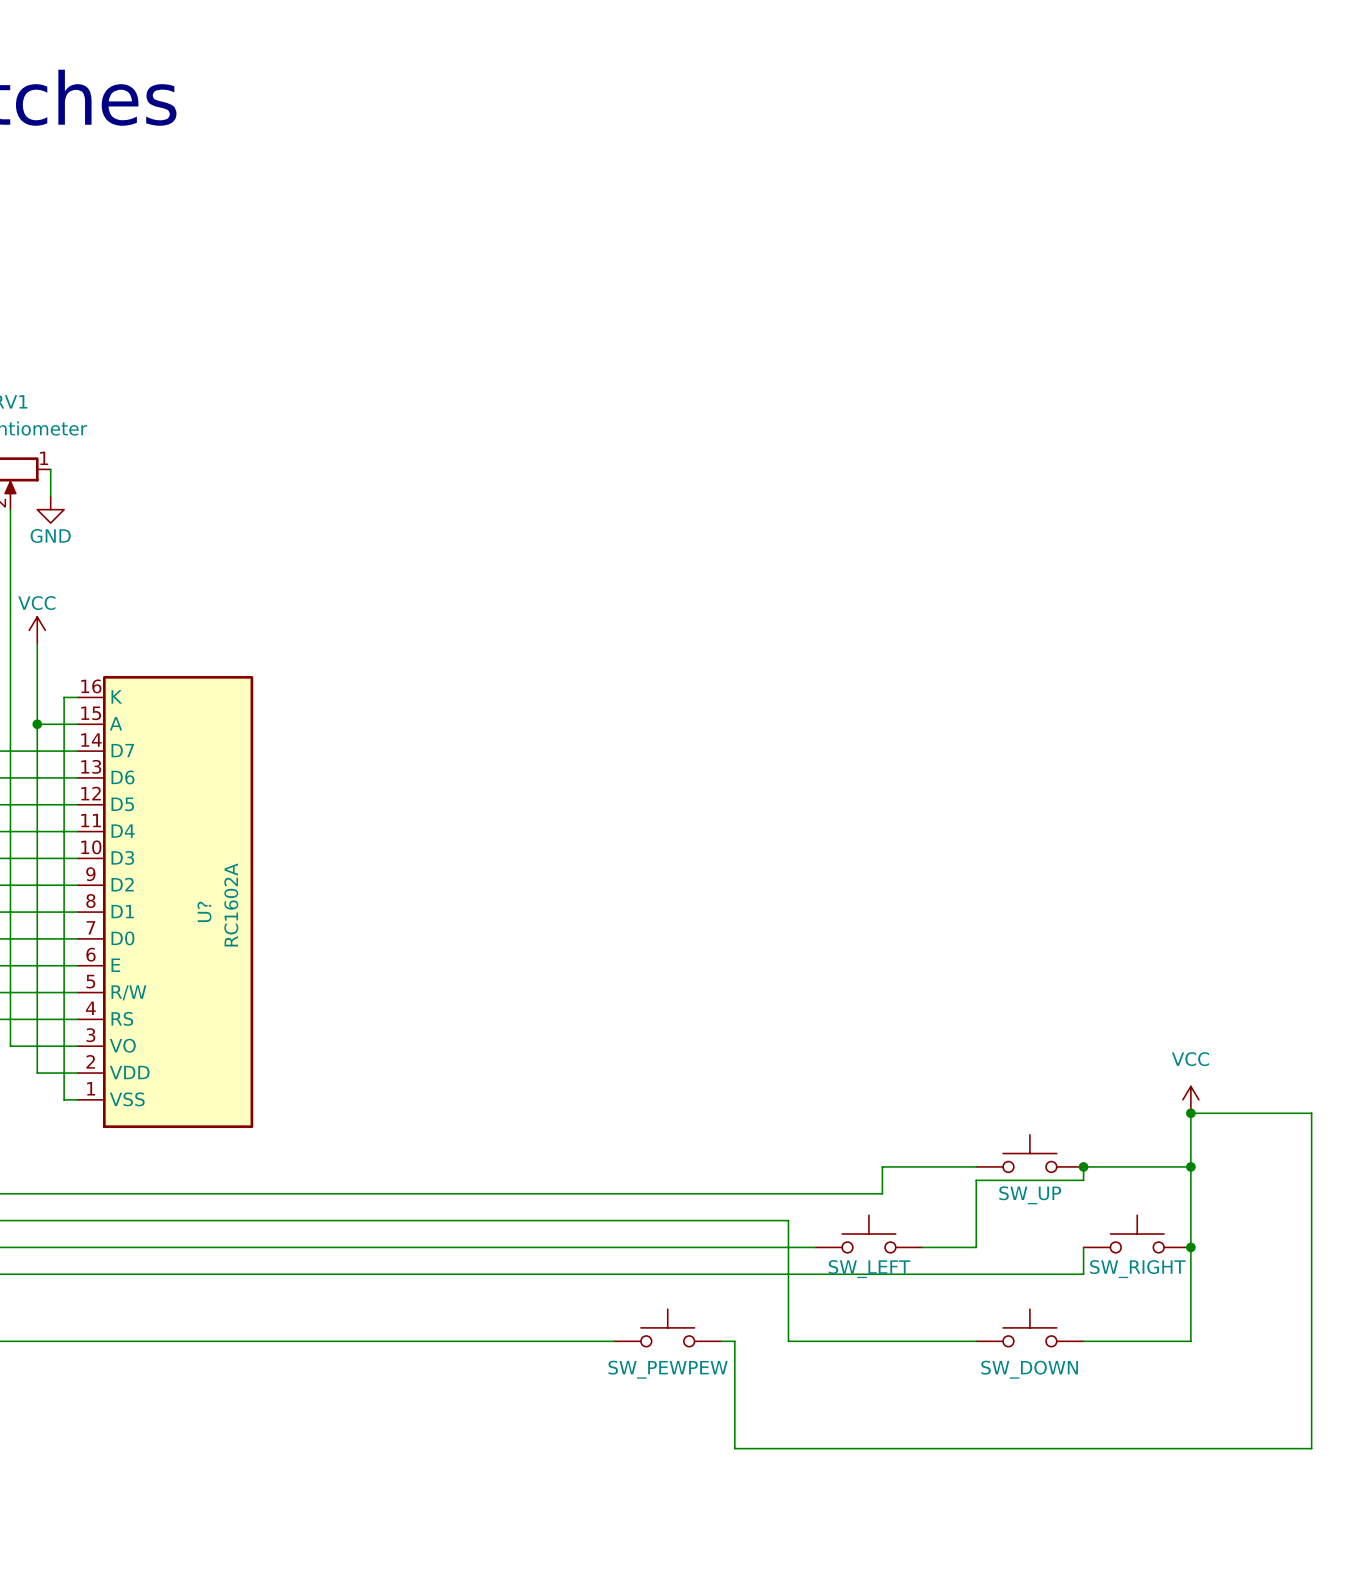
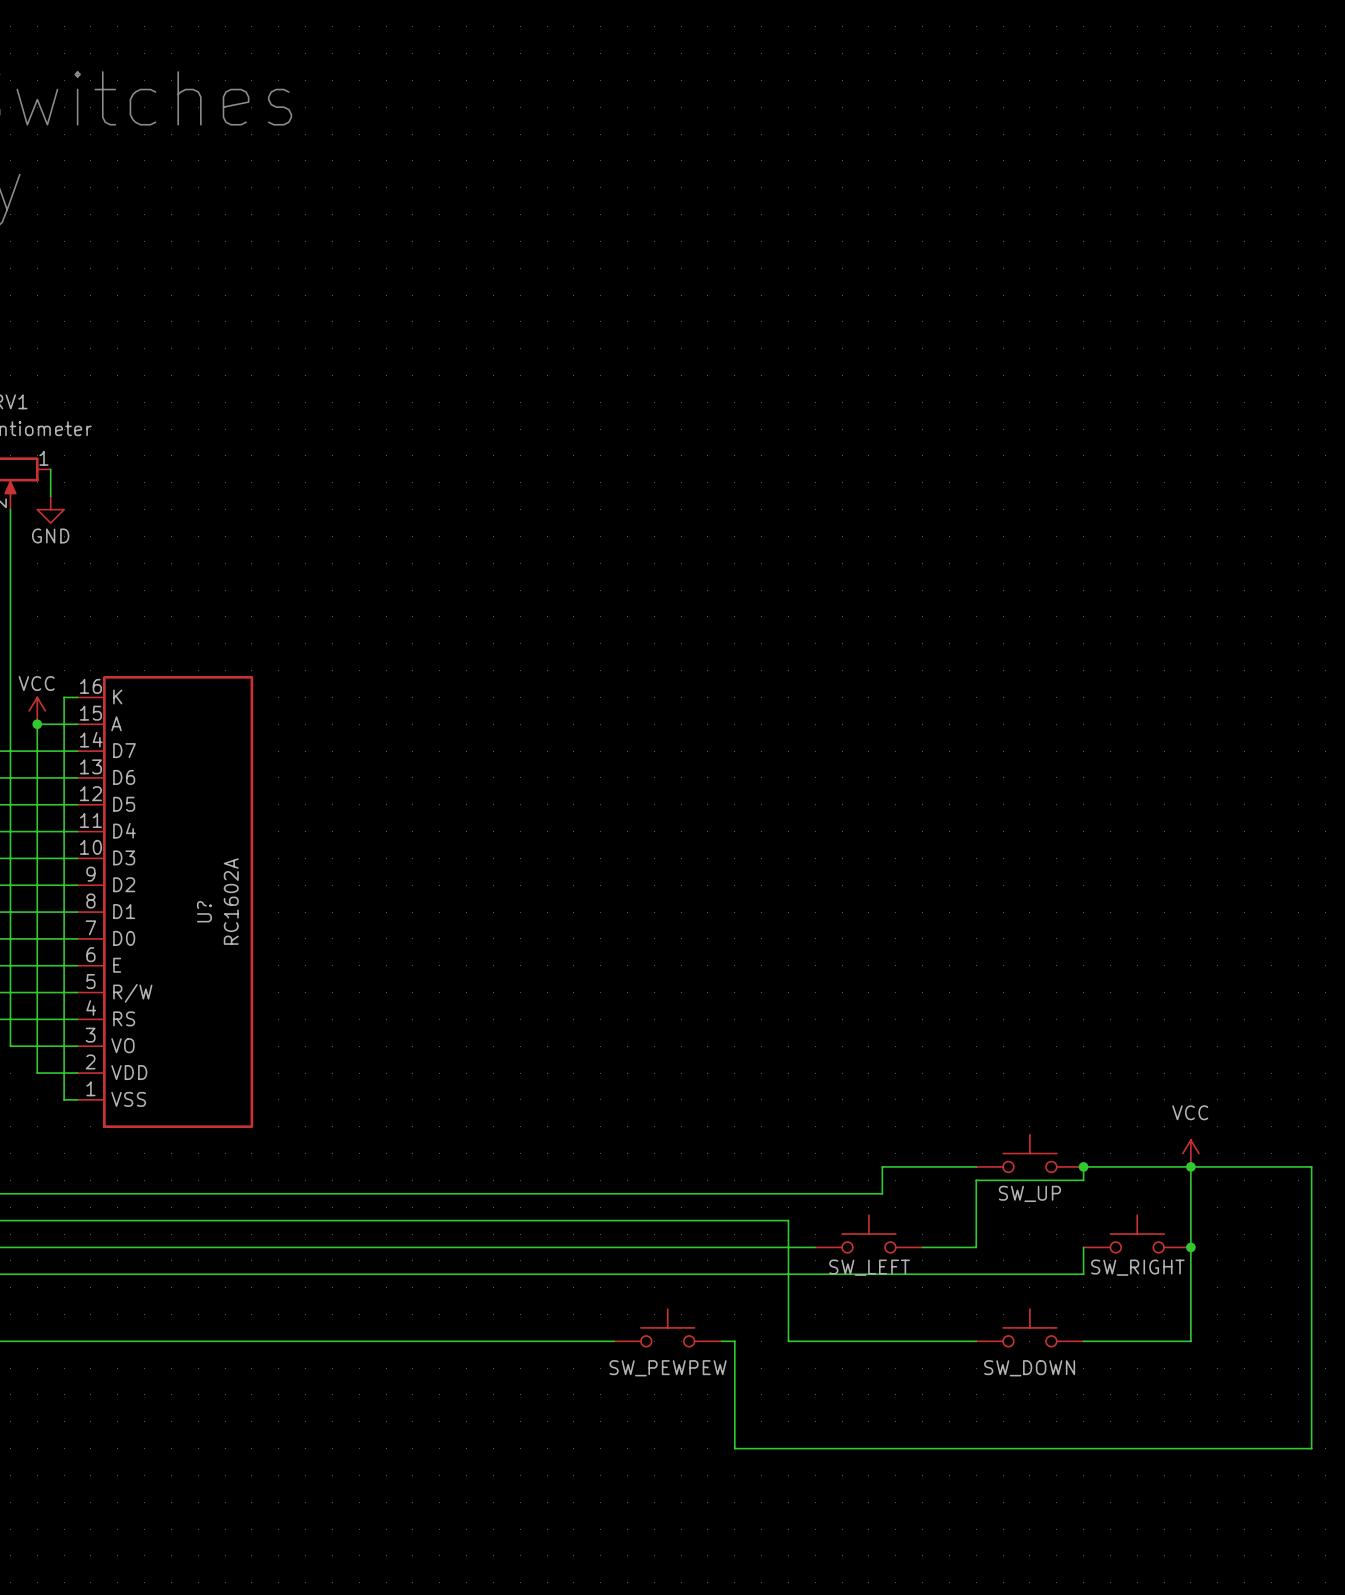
power symbol position: VCC (37, 630) -> VCC (37, 710)
wire: (37, 643) (37, 724) -> none
power symbol position: VCC (1190, 1099) -> VCC (1190, 1153)
junction: (1190, 1113) -> none
wire: (1190, 1166) (1190, 1113) (1311, 1113) (1311, 1166) -> (1190, 1166) (1311, 1166)

